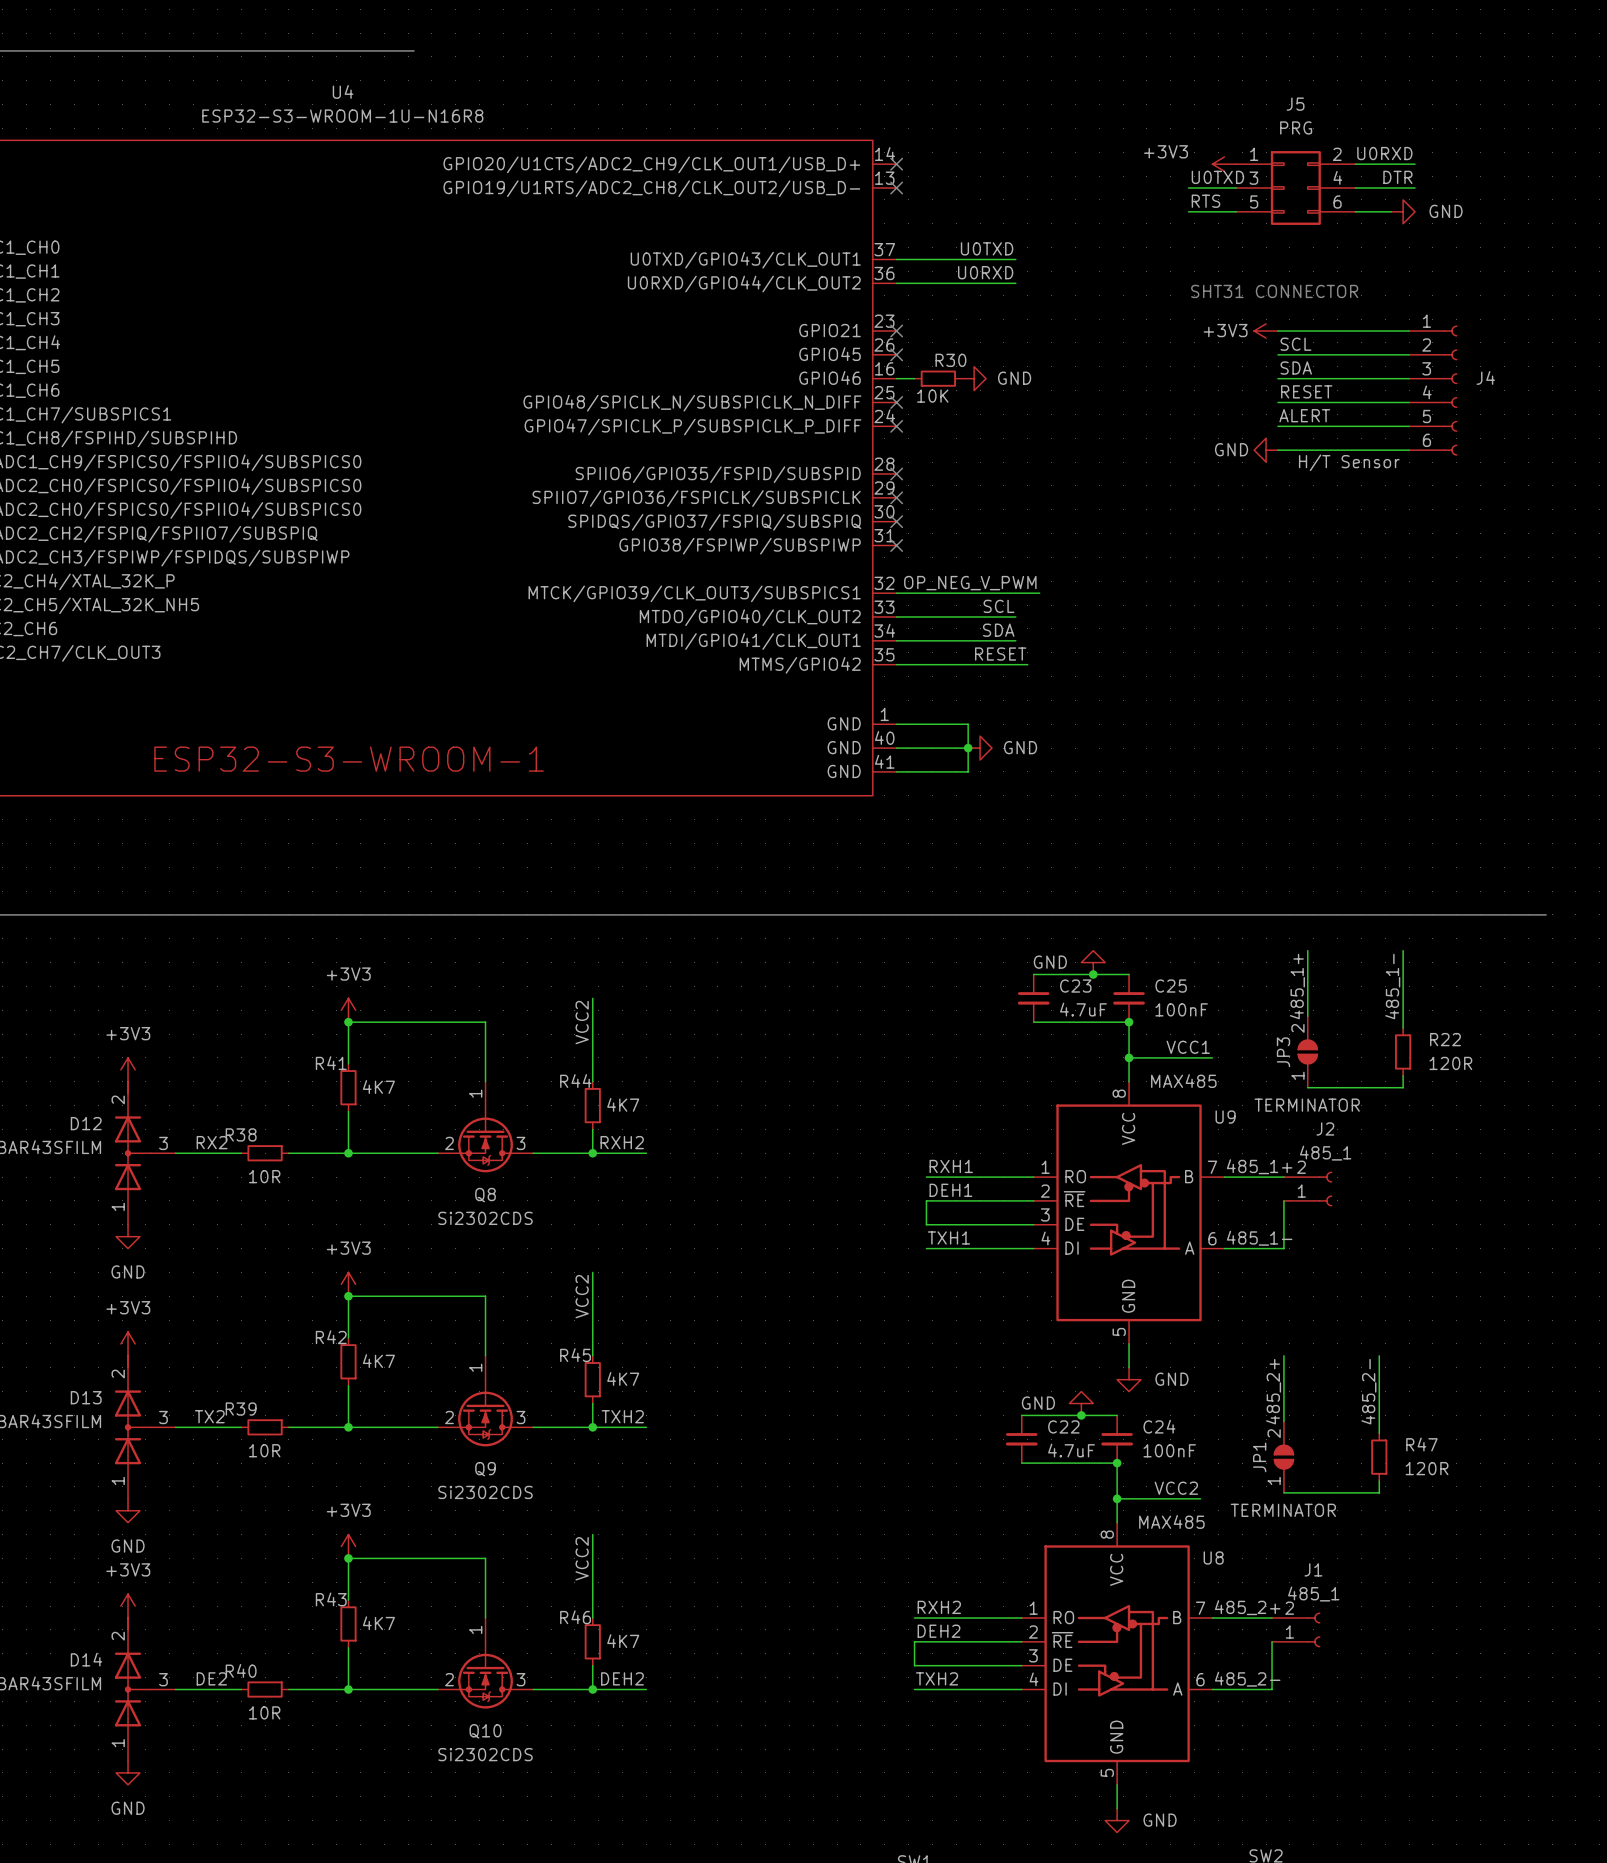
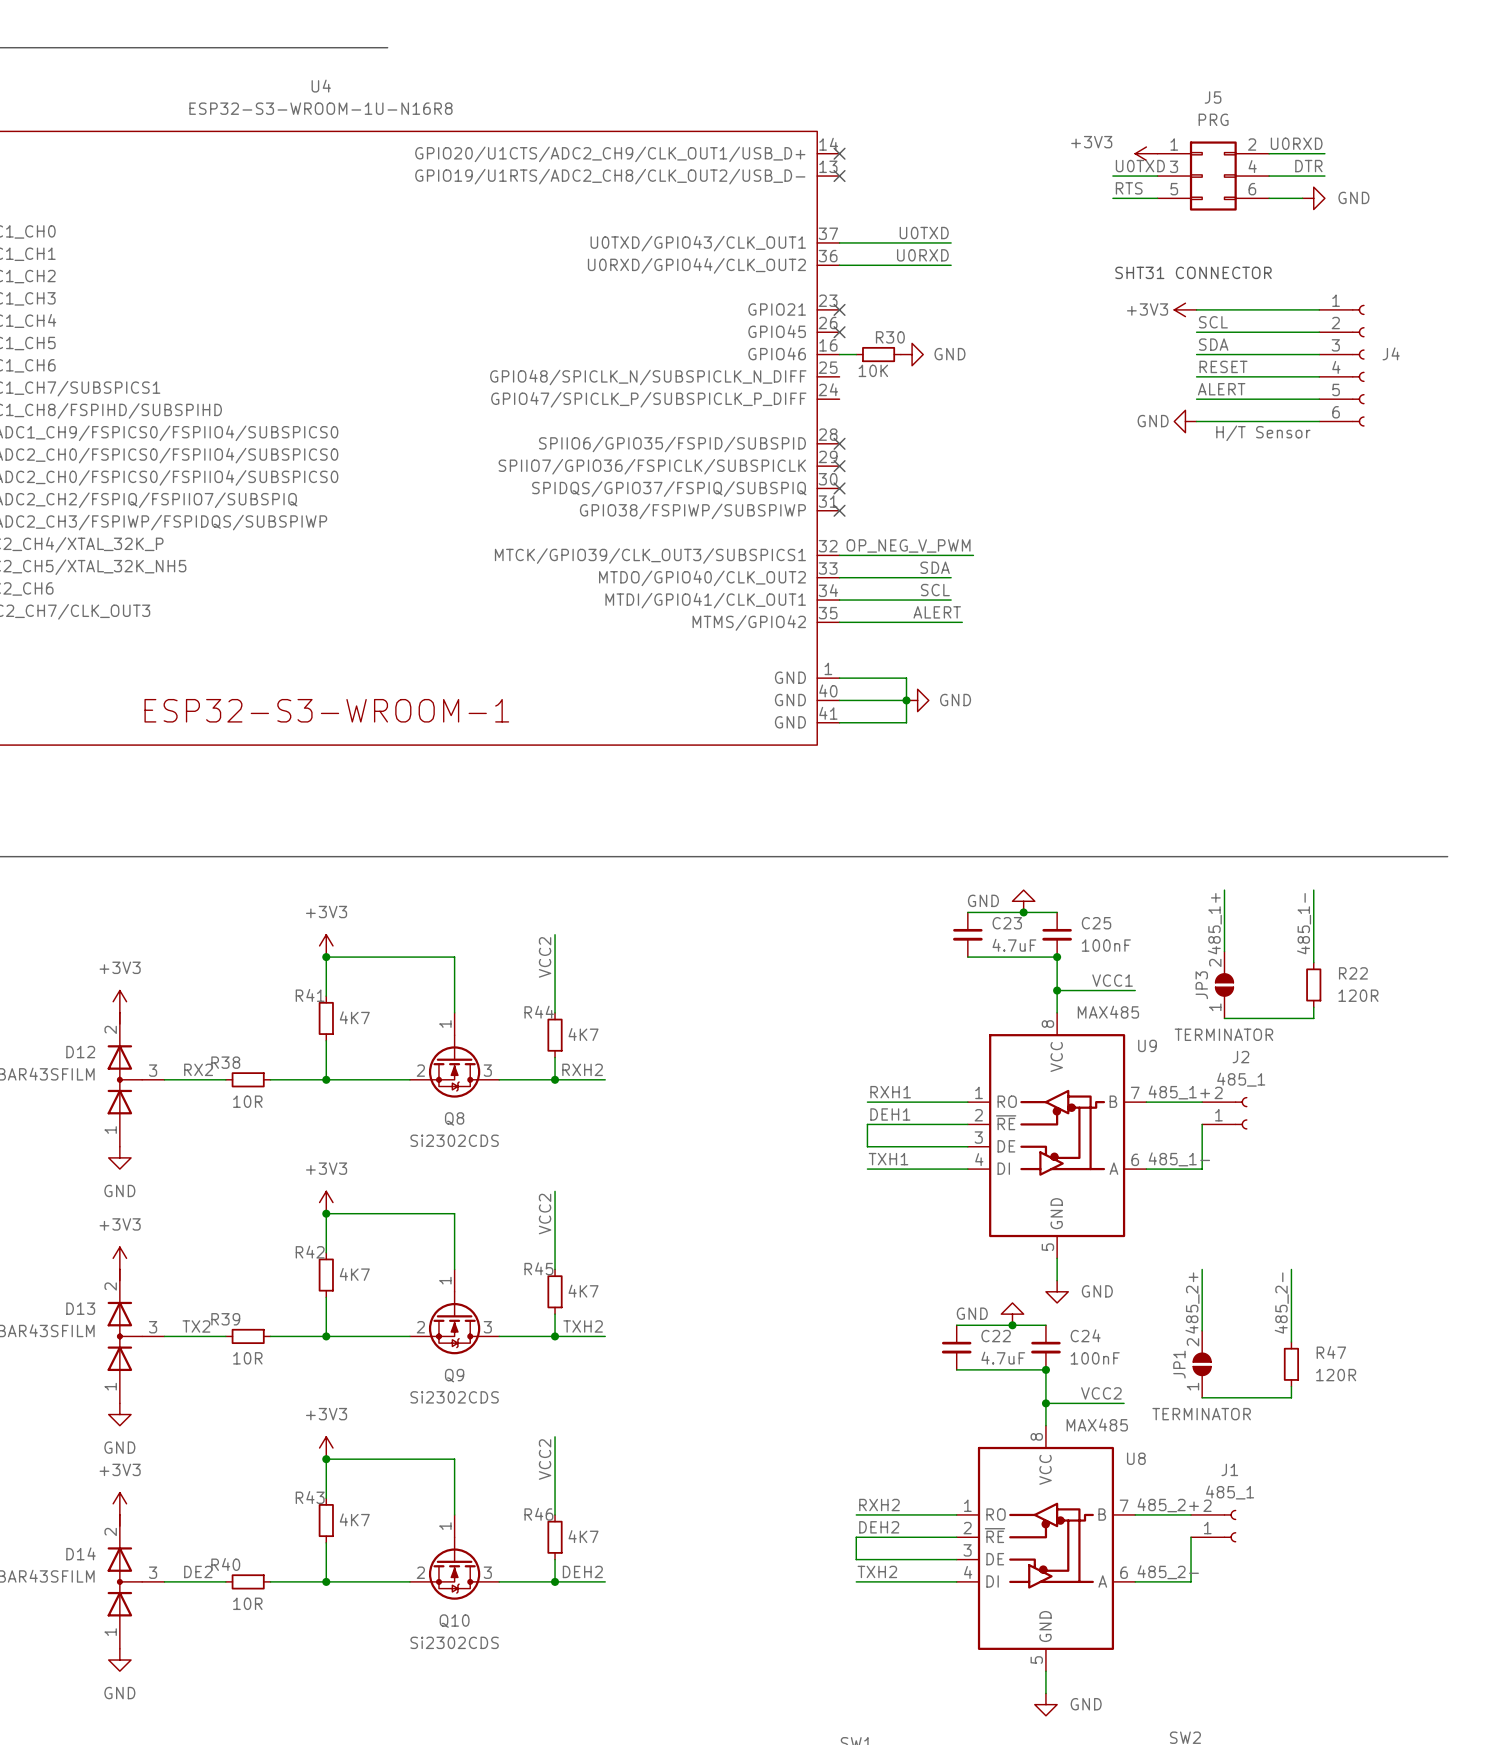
no-connect mark: (896, 402) -> none
no-connect mark: (896, 426) -> none
label: SCL (998, 606) -> SDA (935, 567)
label: SDA (998, 630) -> SCL (935, 590)
label: RESET (1000, 654) -> ALERT (937, 612)

